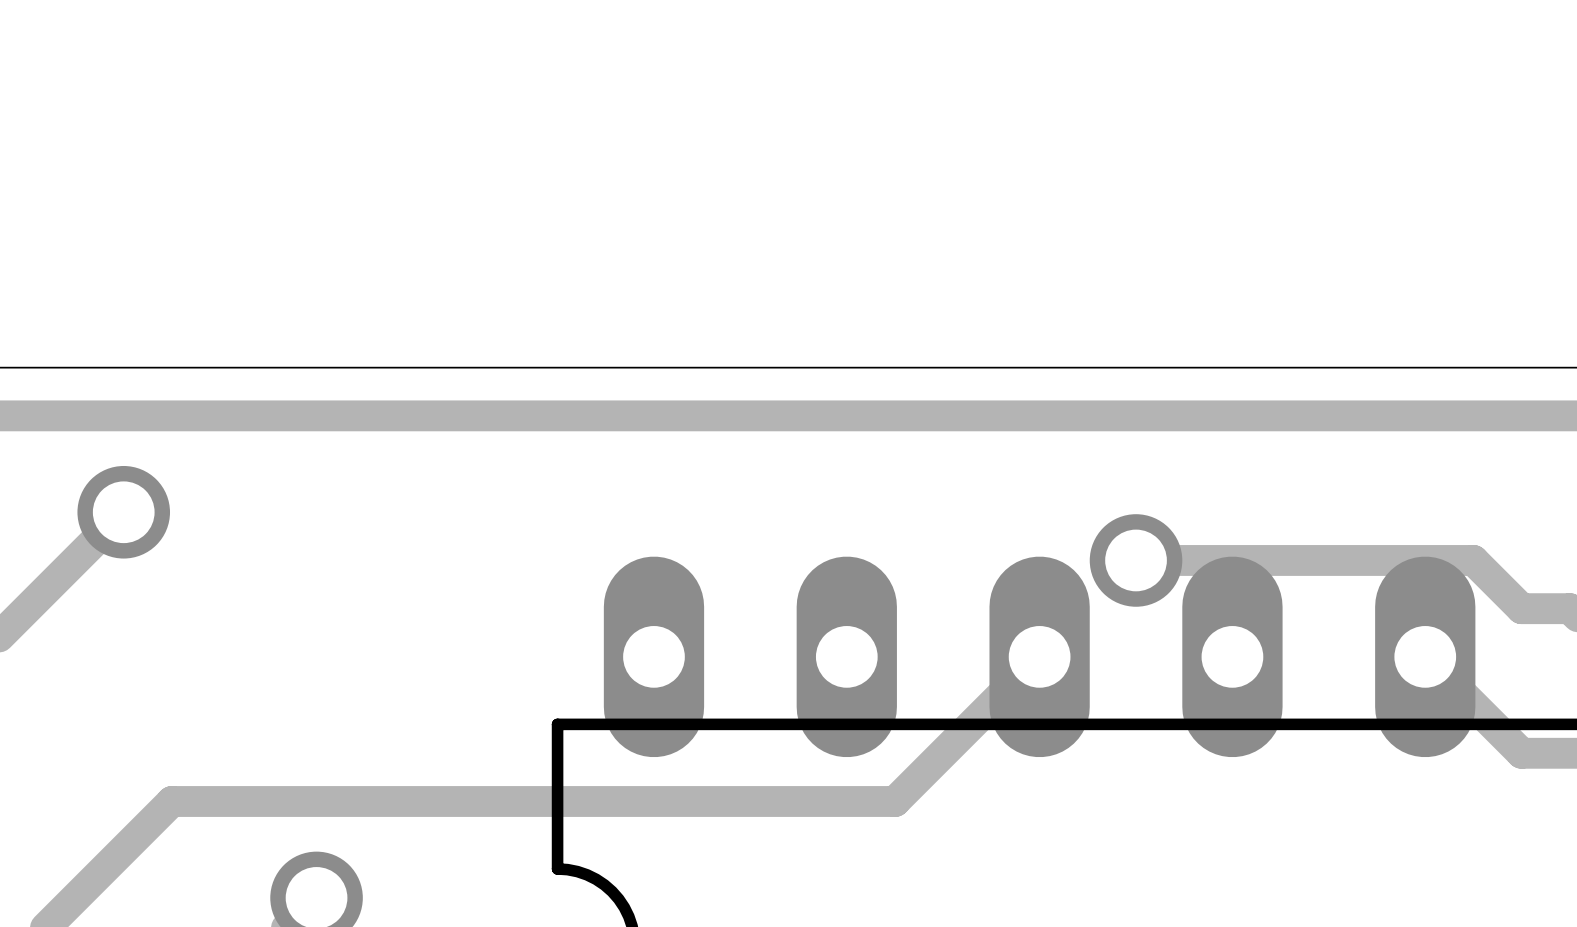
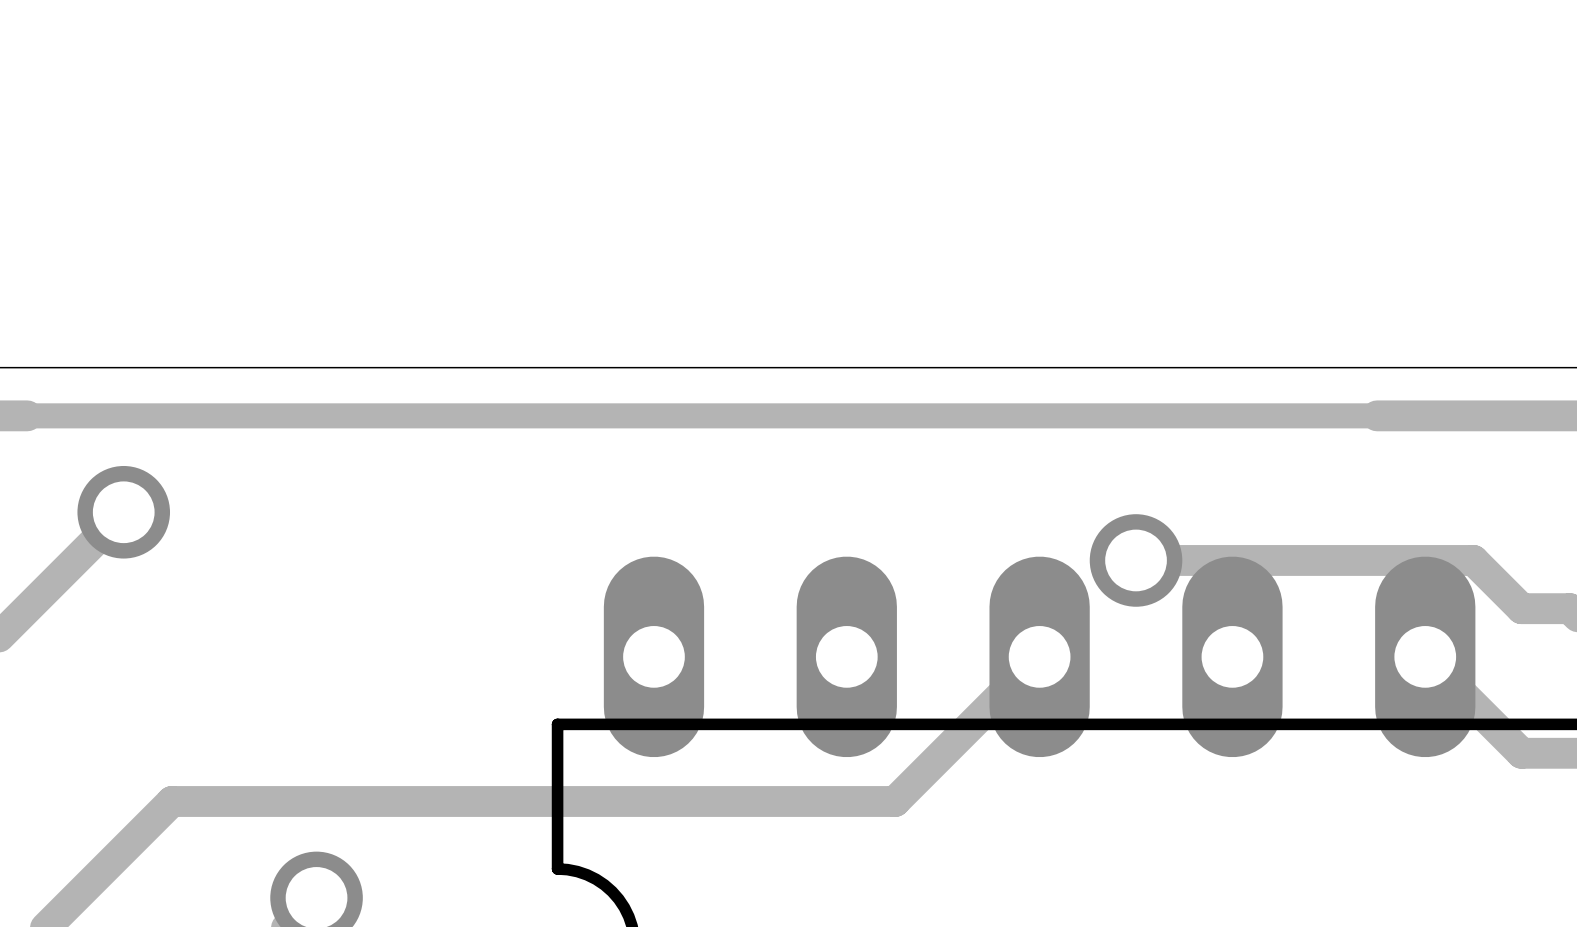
track width: thick (27, 415) (1377, 415) -> thin (27, 415) (1377, 415)

